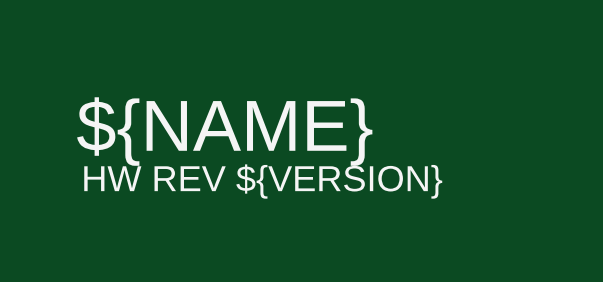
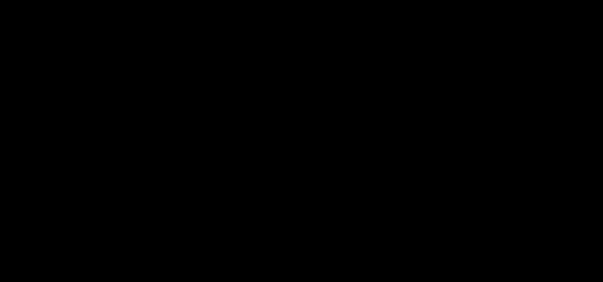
text: ${NAME} (224, 131) -> none
text: HW REV ${VERSION} (263, 181) -> none

